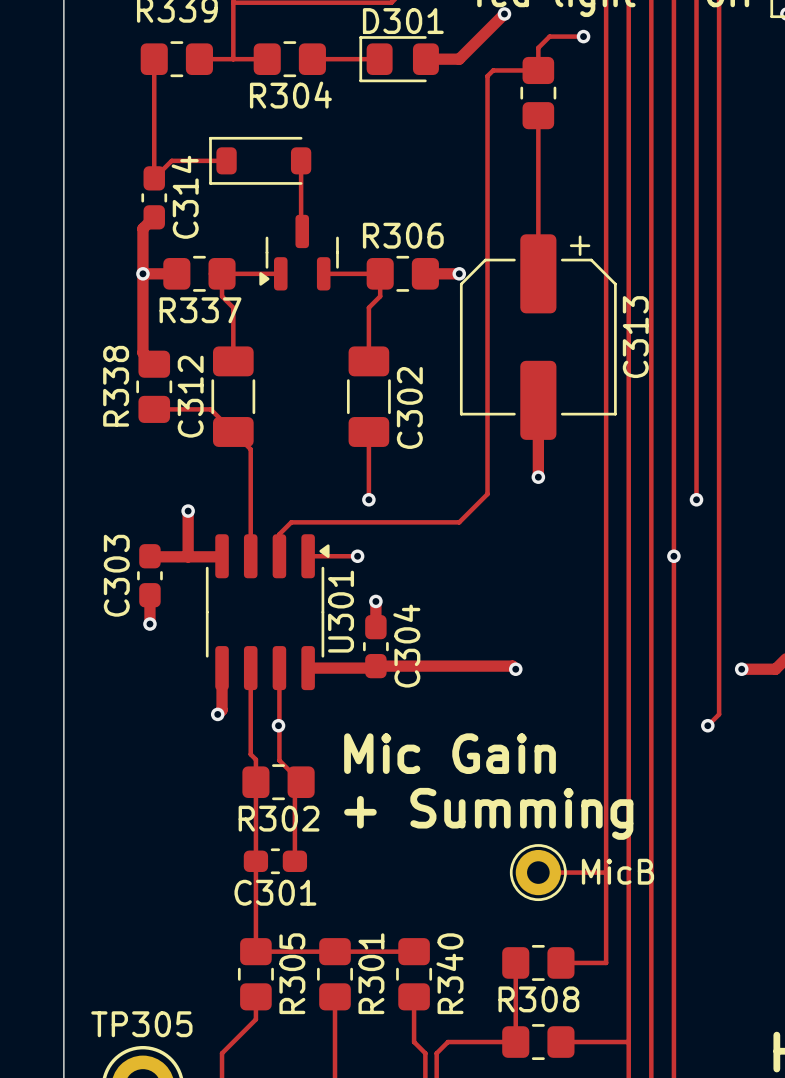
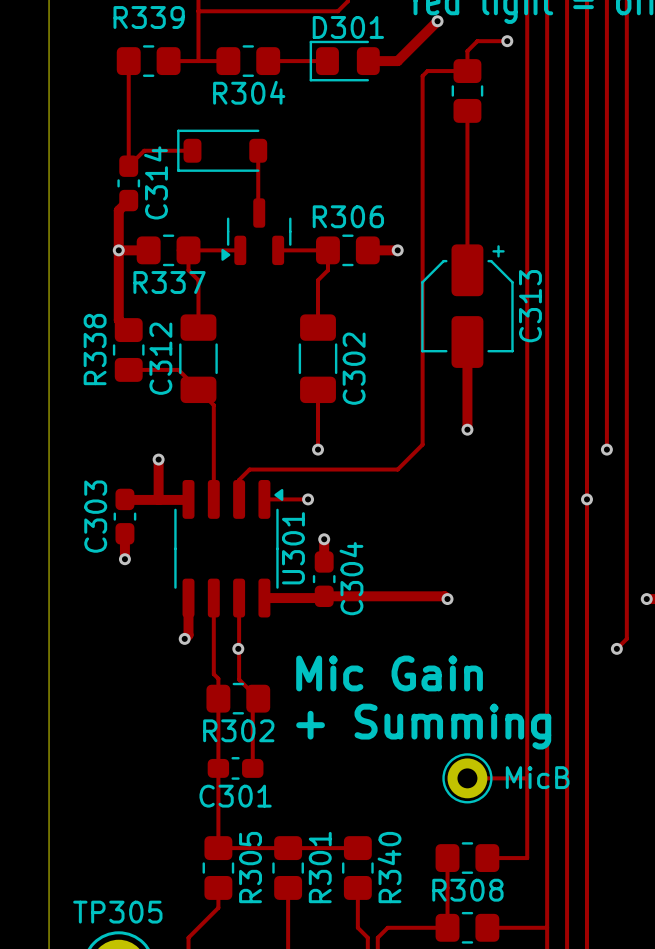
C313 footprint: [459, 234, 617, 440] -> [421, 244, 514, 368]

